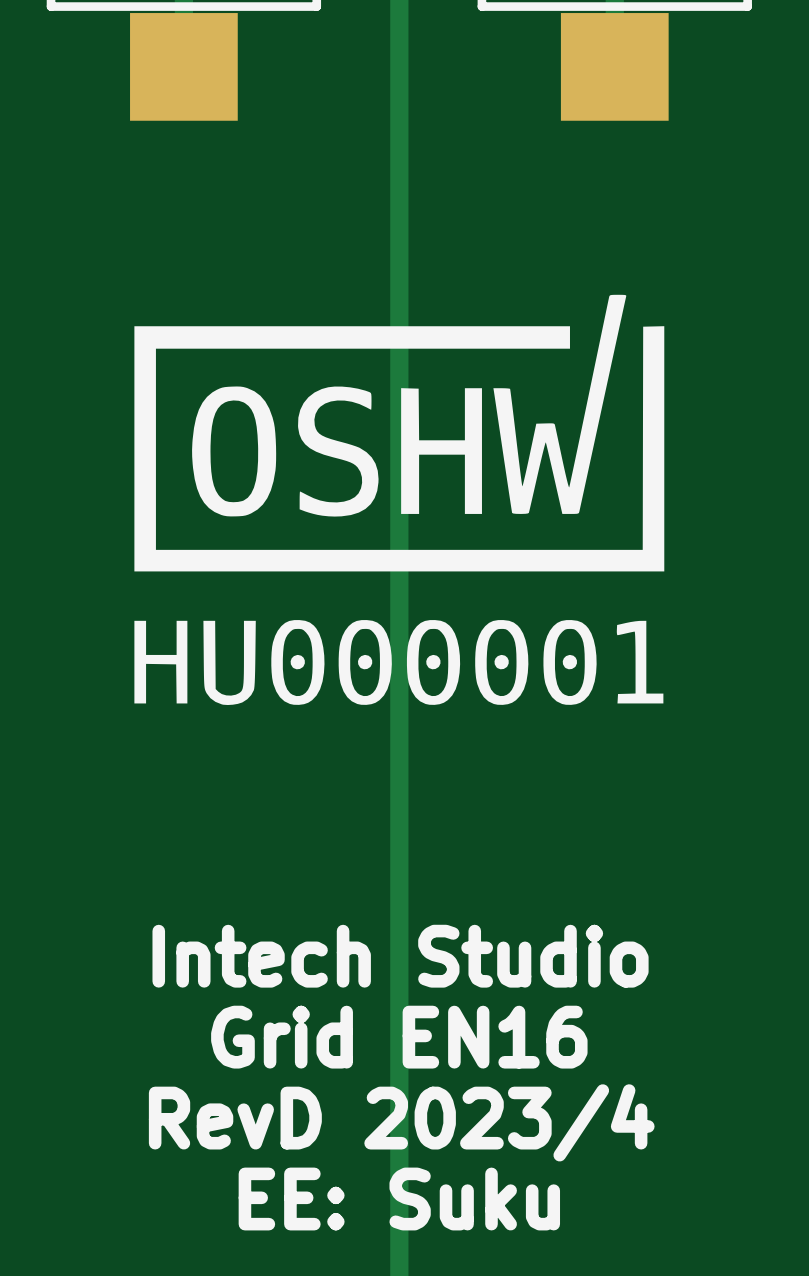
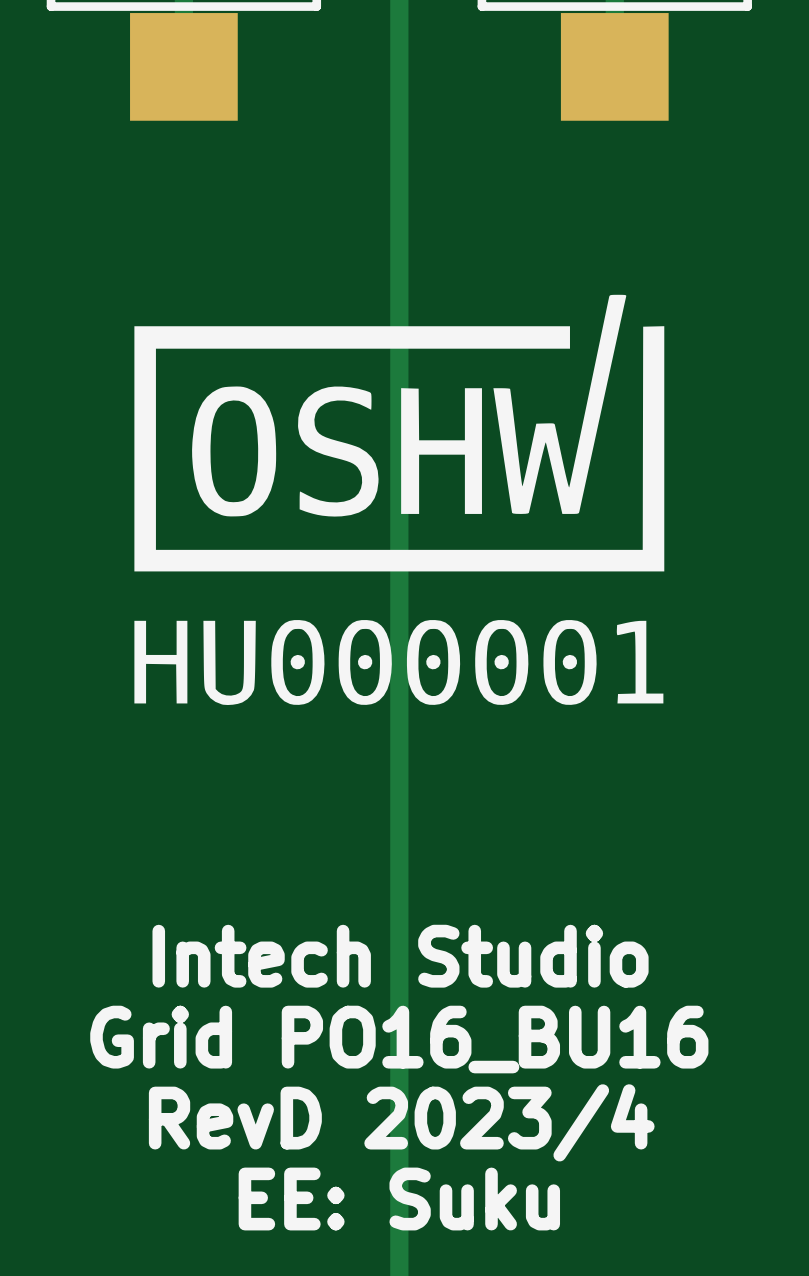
text: Grid EN16 (399, 1037) -> Grid PO16_BU16 (399, 1039)

